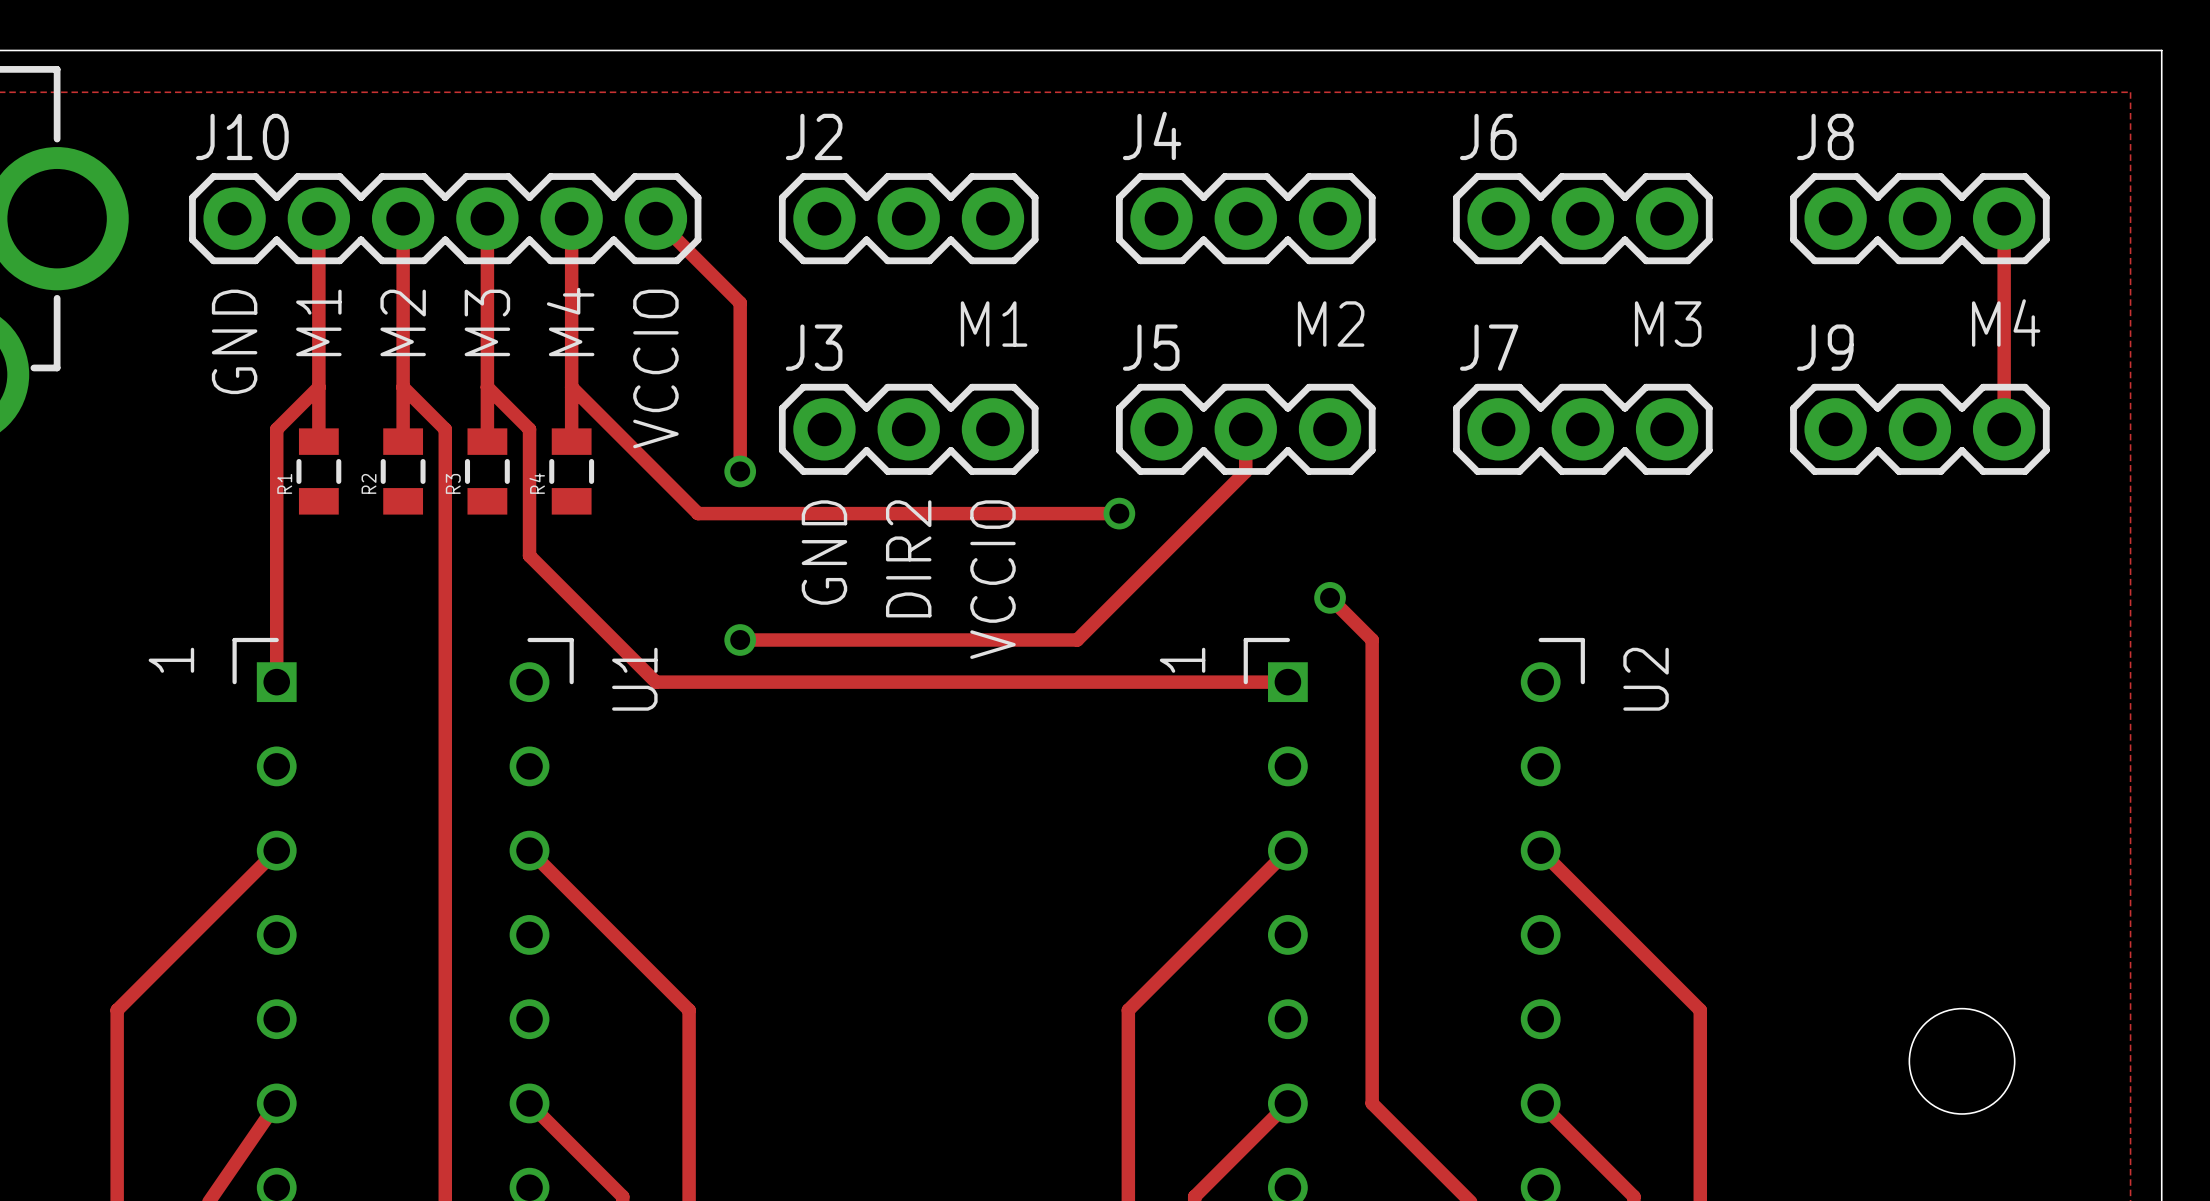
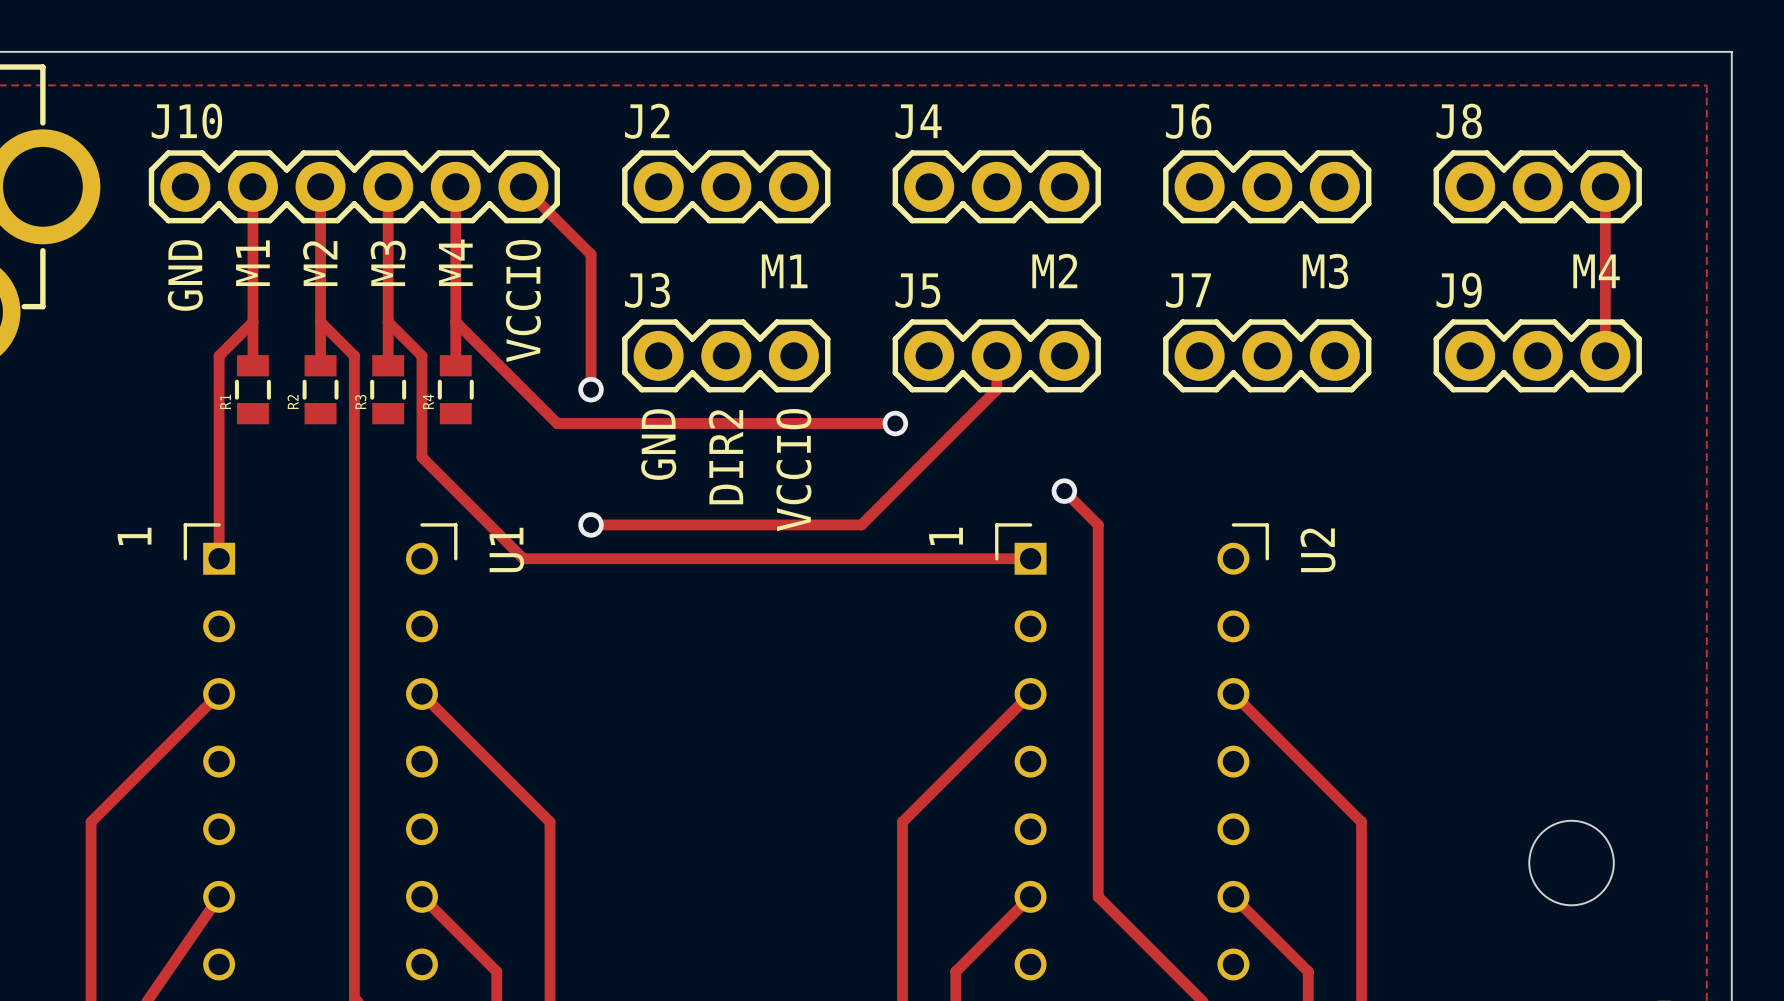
text position: M4 (2006, 323) -> M4 (1596, 271)
text position: M1 (994, 324) -> M1 (784, 271)
text position: M2 (1331, 324) -> M2 (1054, 271)
text position: M3 (1668, 324) -> M3 (1325, 271)

